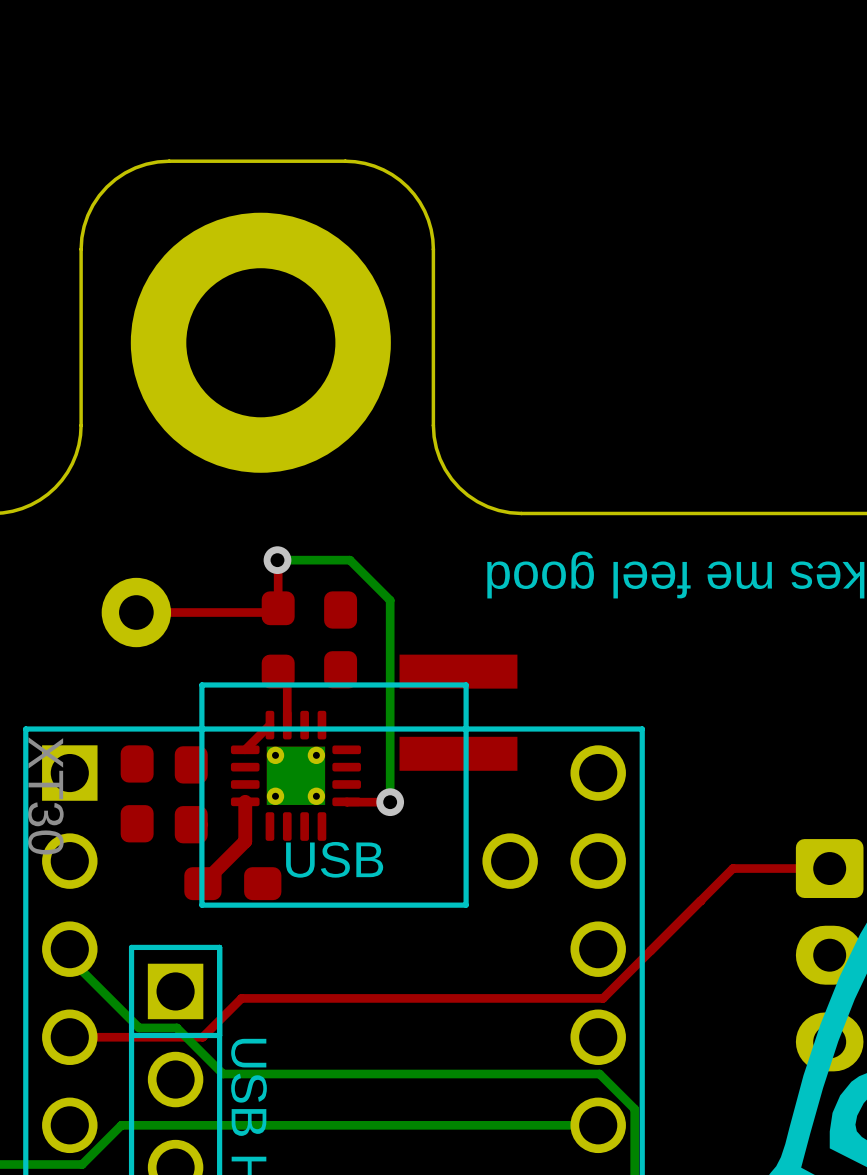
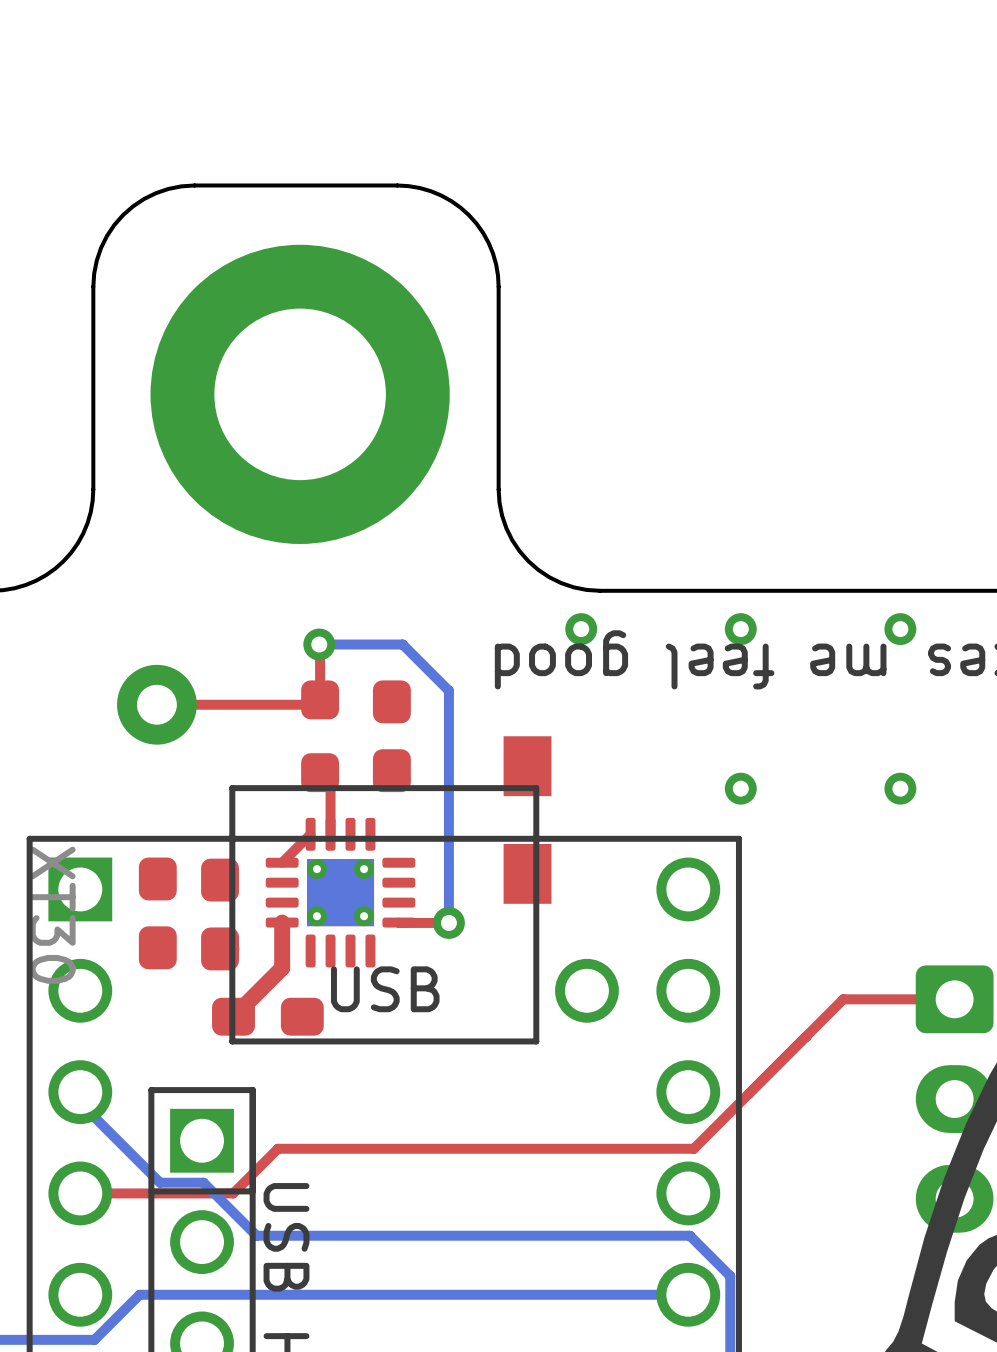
via: none -> (581, 629)
via: none -> (740, 629)
via: none -> (900, 629)
part footprint: [399, 654, 518, 771] -> [503, 736, 552, 904]
via: none -> (740, 788)
via: none -> (900, 788)

